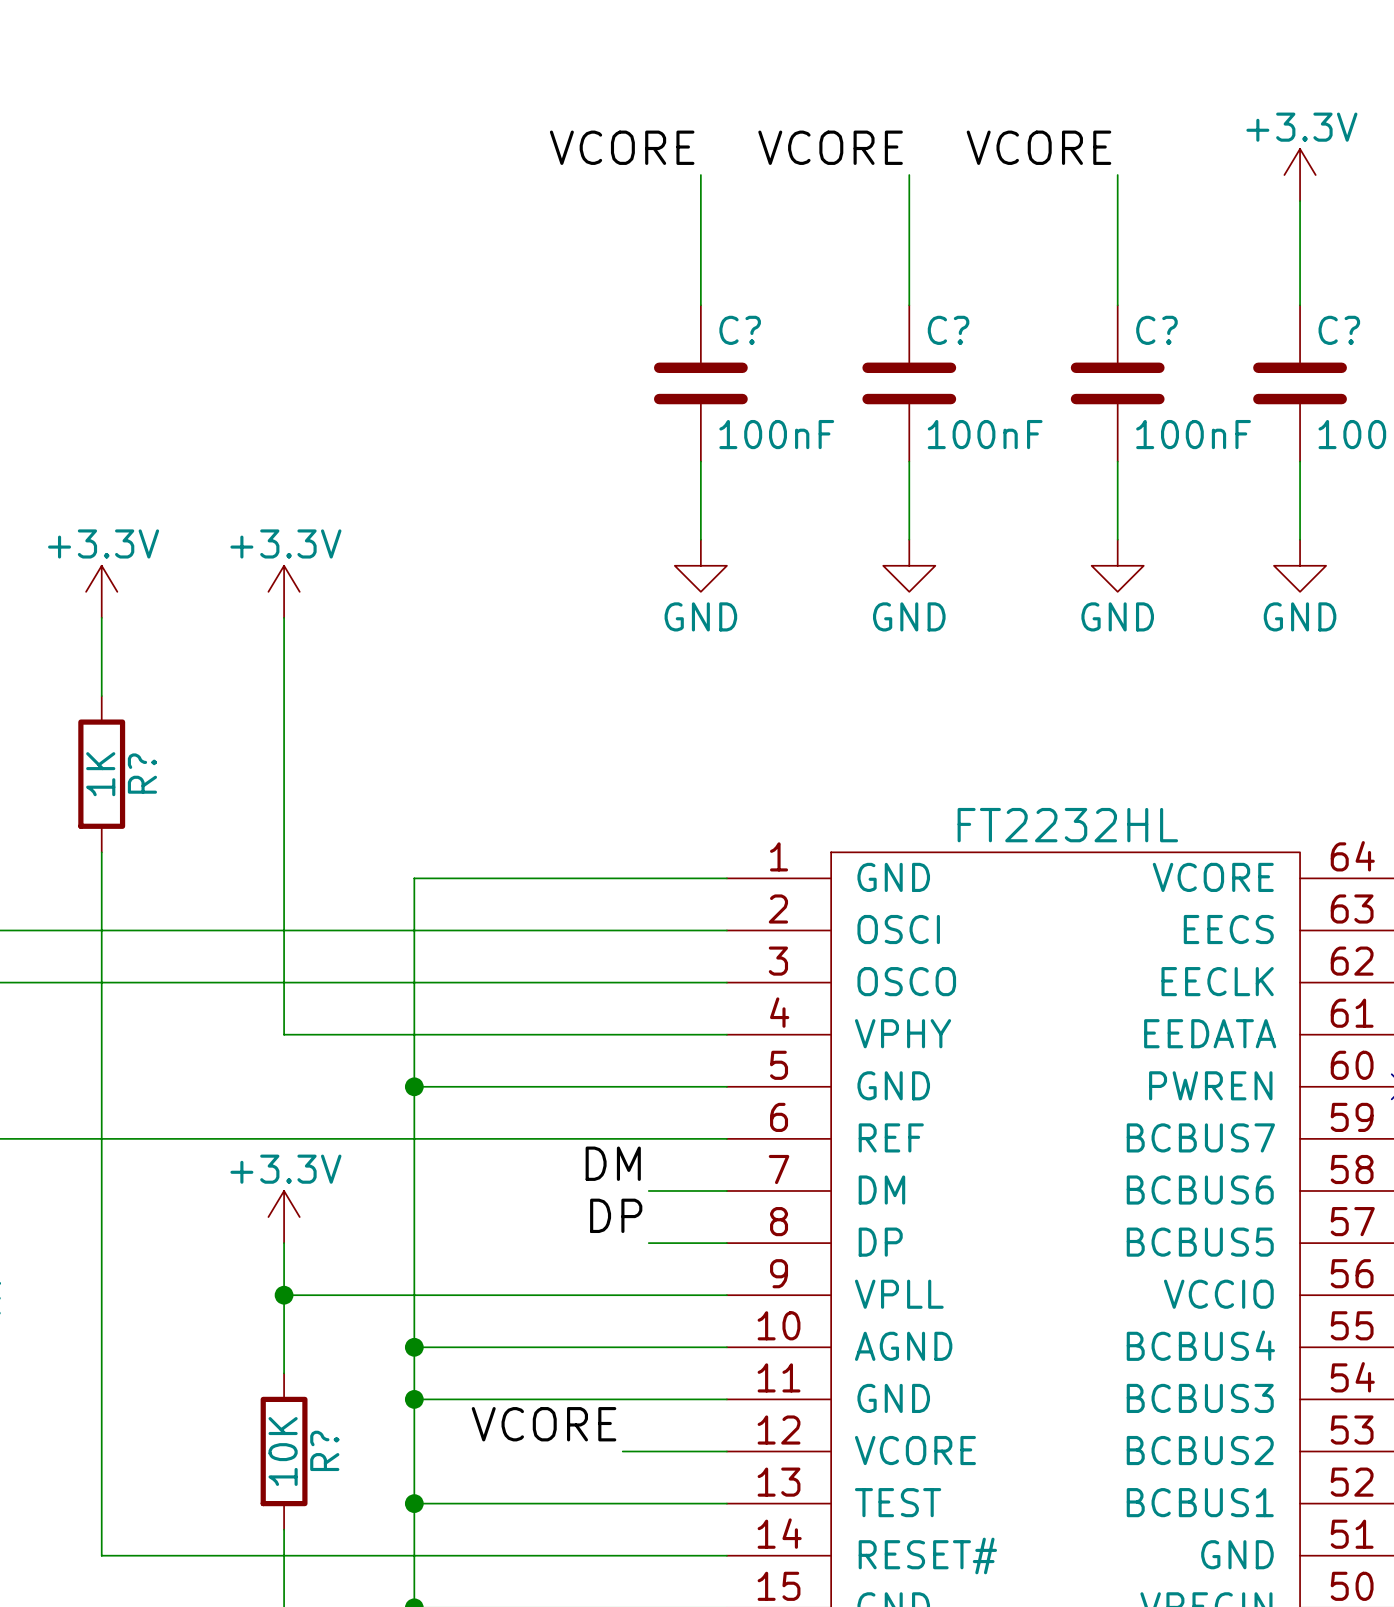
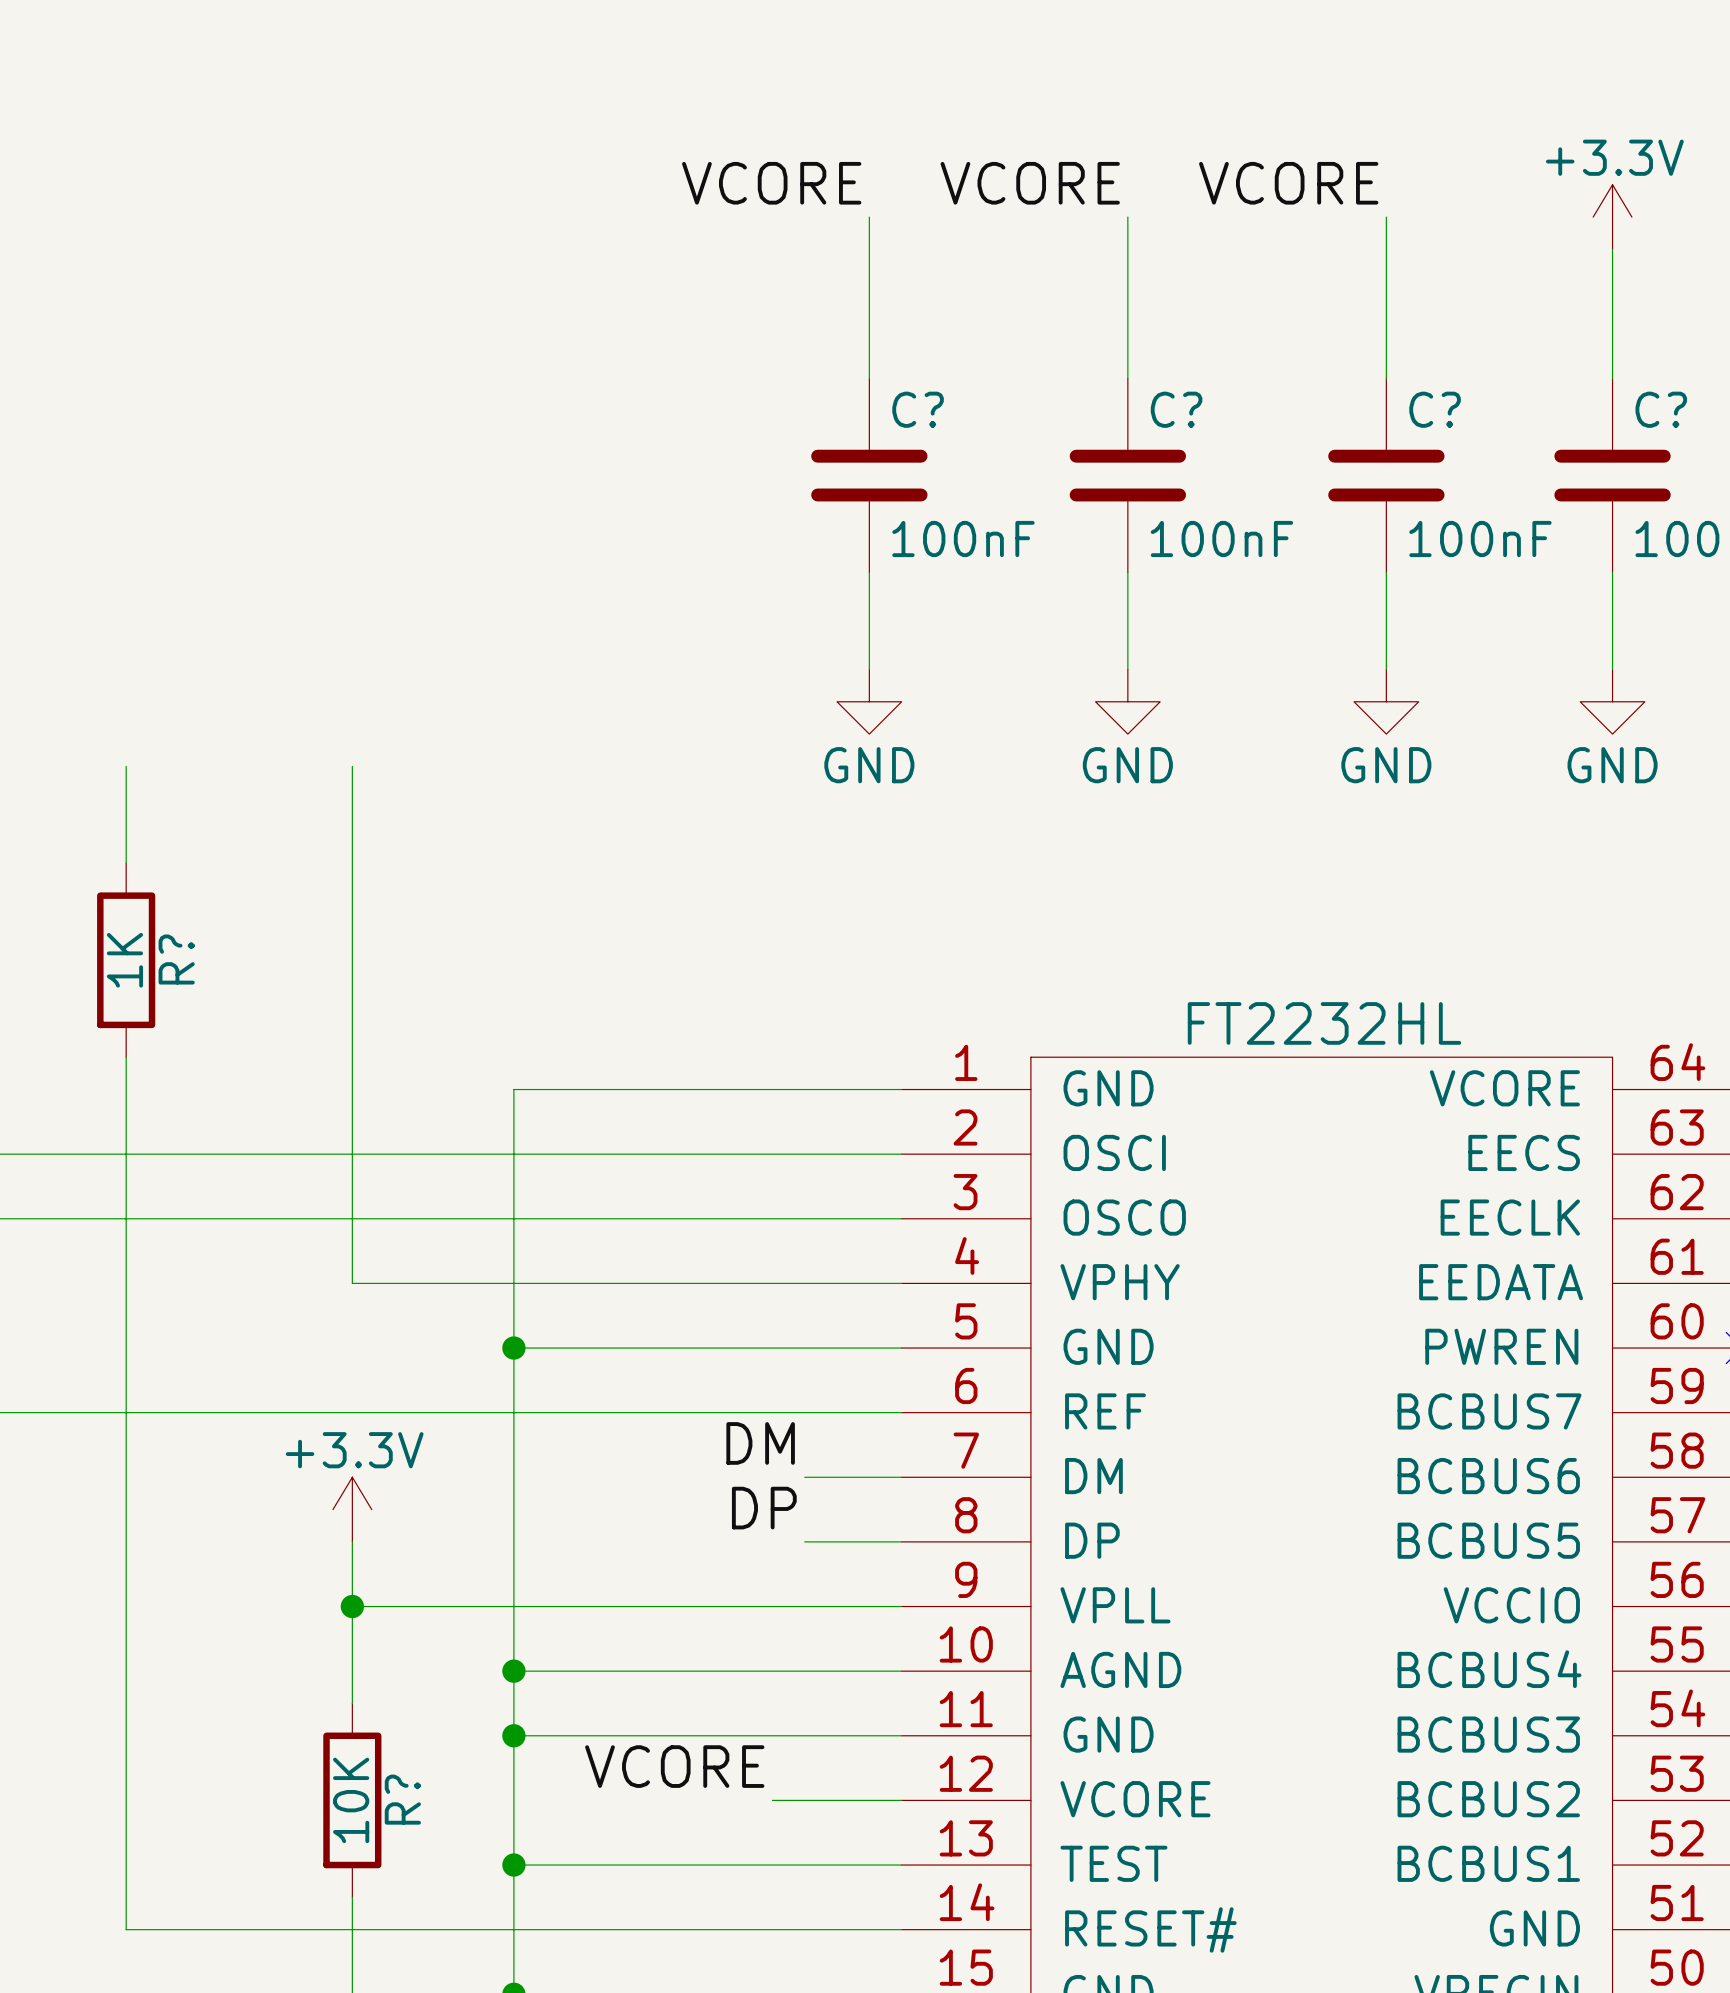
power symbol: +3.3V (101, 591) -> none
power symbol: +3.3V (284, 591) -> none

